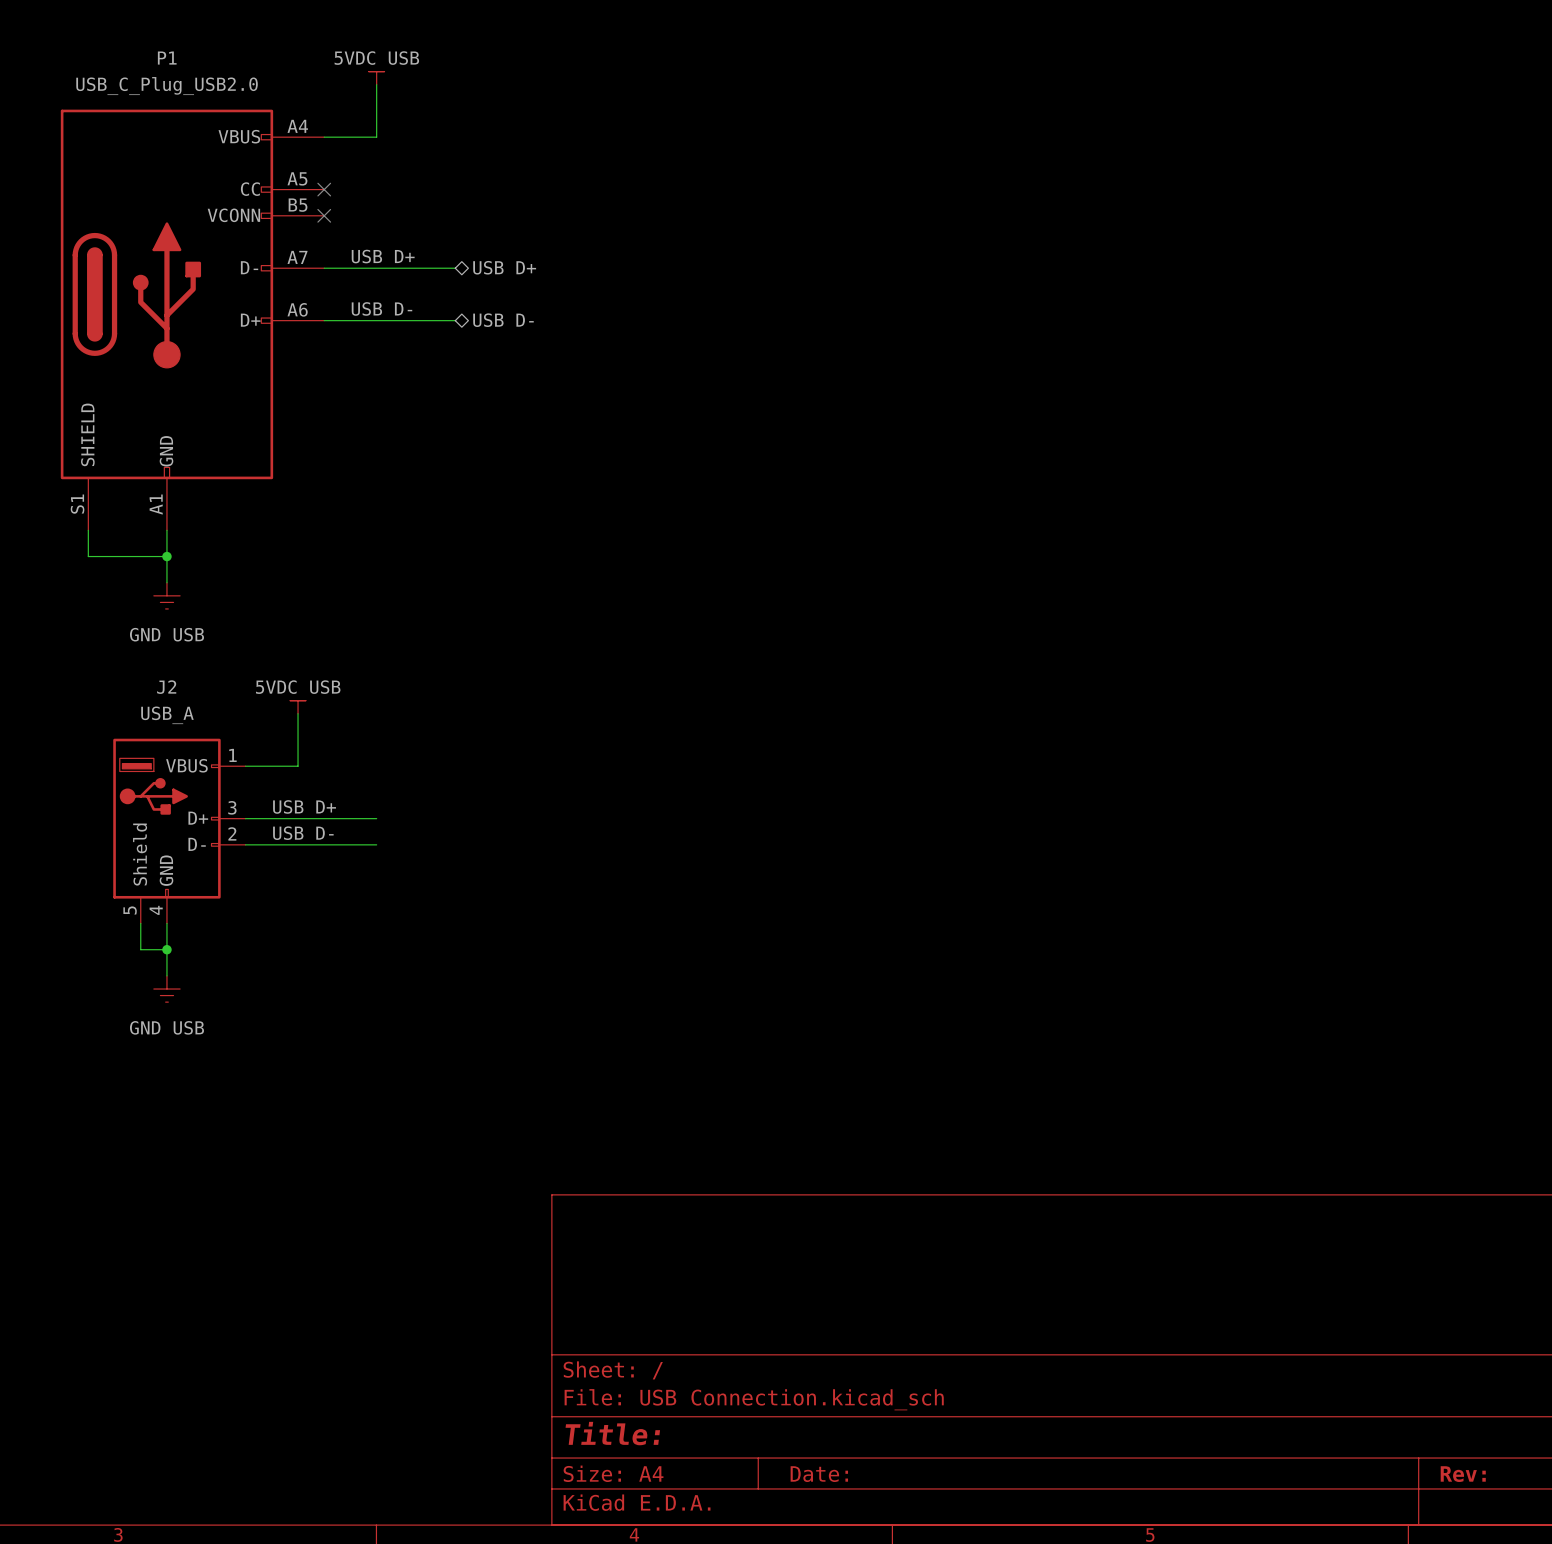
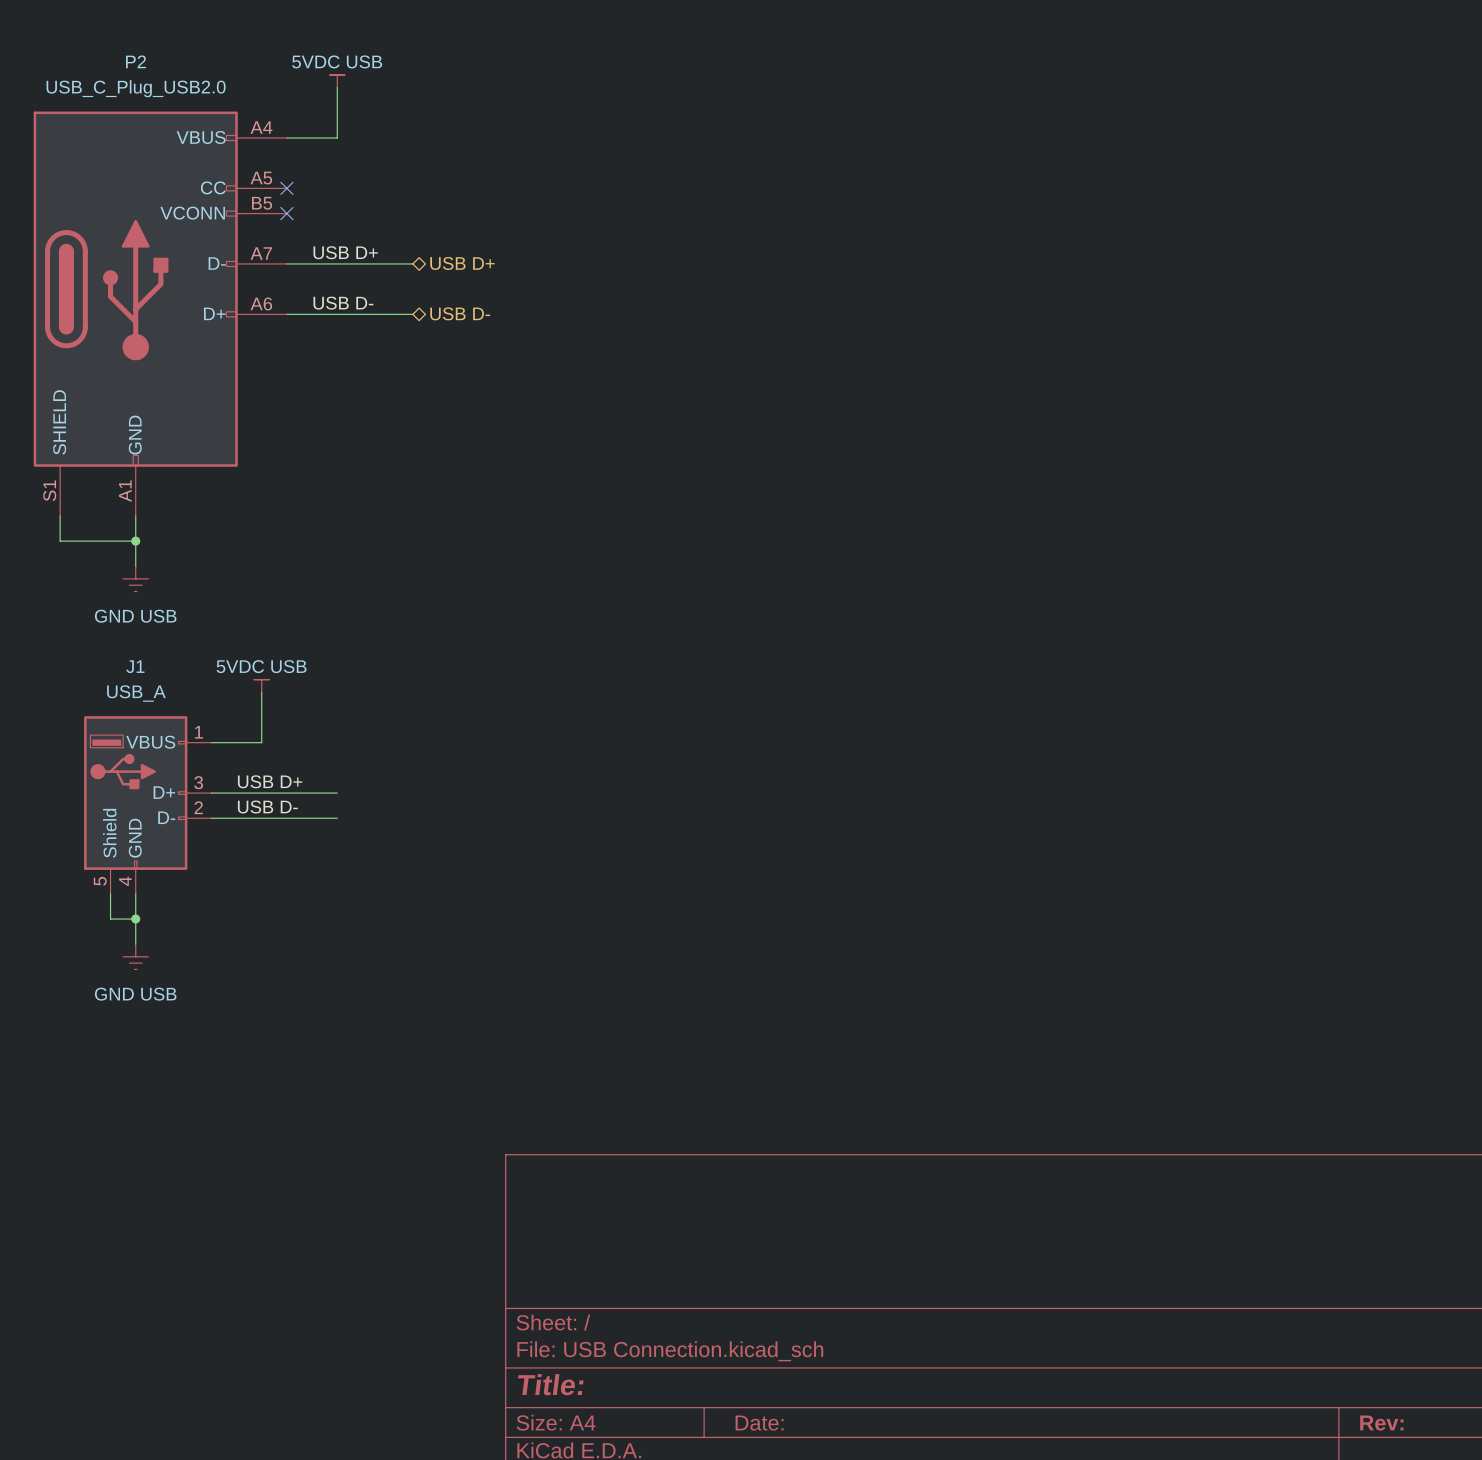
P1 name: P1 (167, 58) -> P2 (136, 61)
J2 name: J2 (166, 687) -> J1 (135, 666)

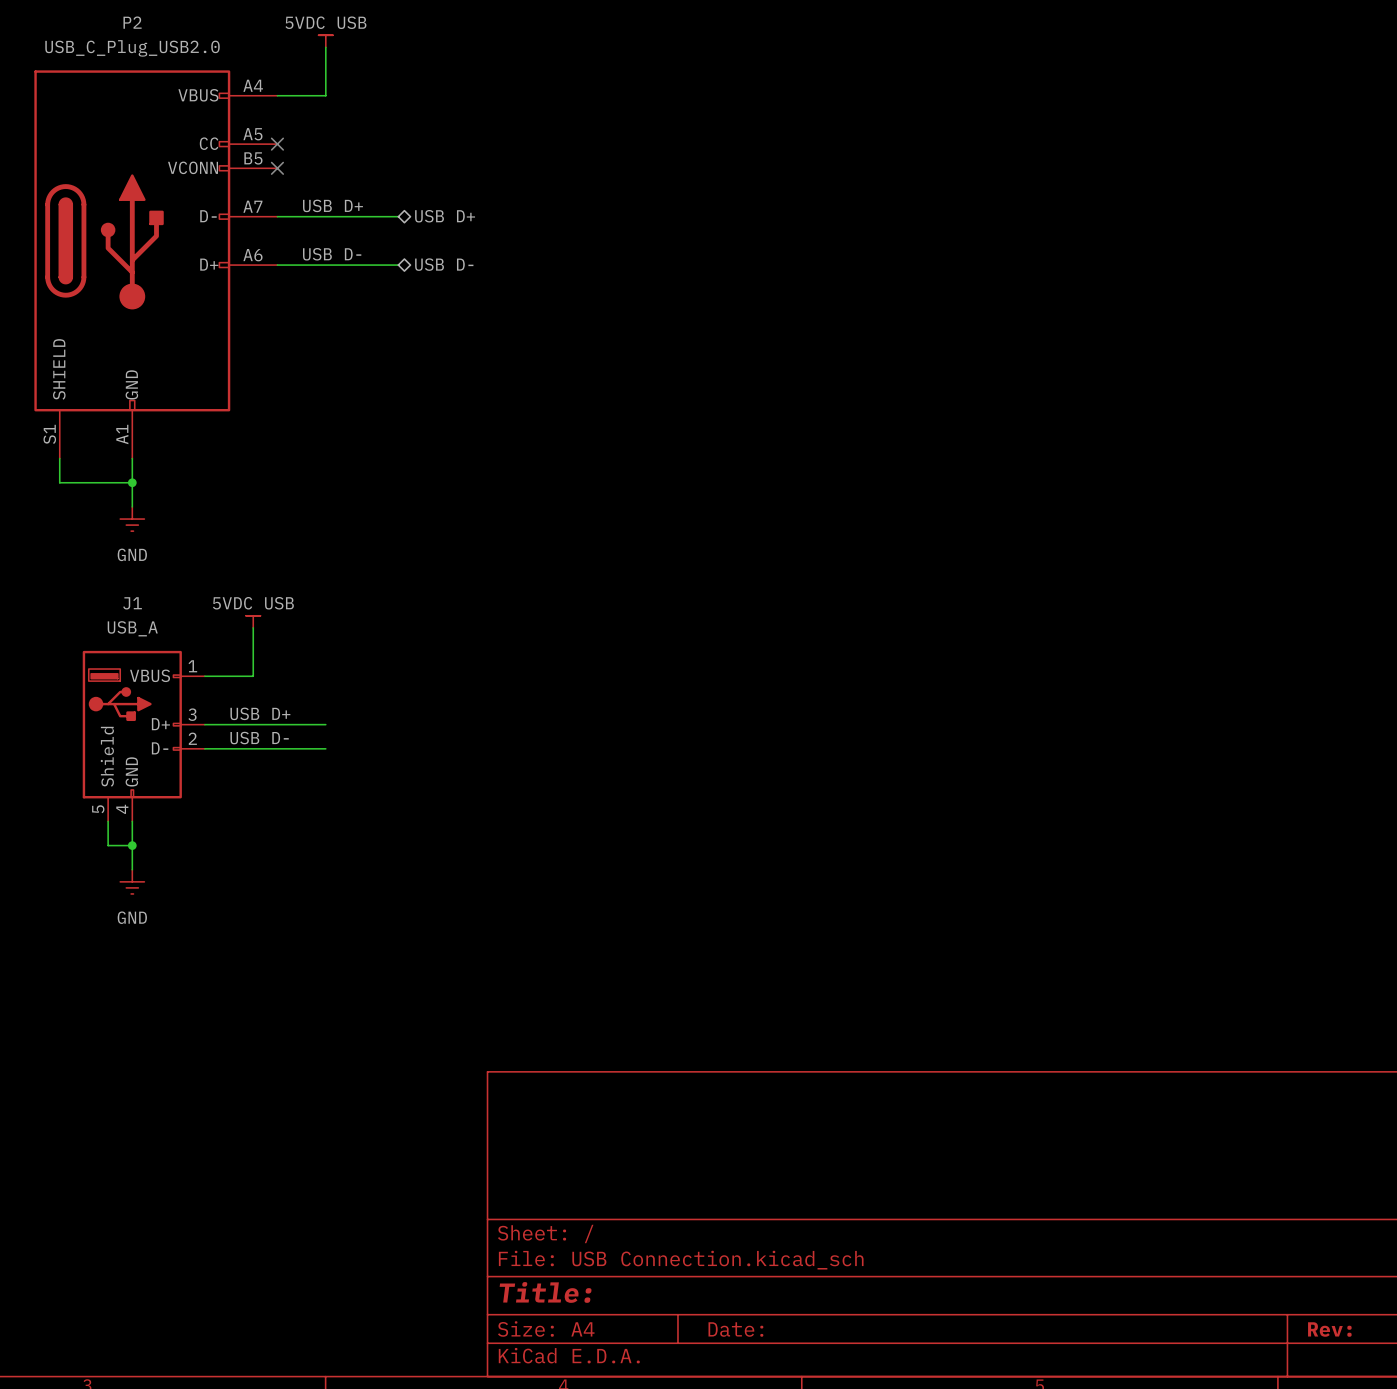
power symbol: GND USB (135, 578) -> GND (132, 519)
power symbol: GND USB (135, 956) -> GND (132, 881)

